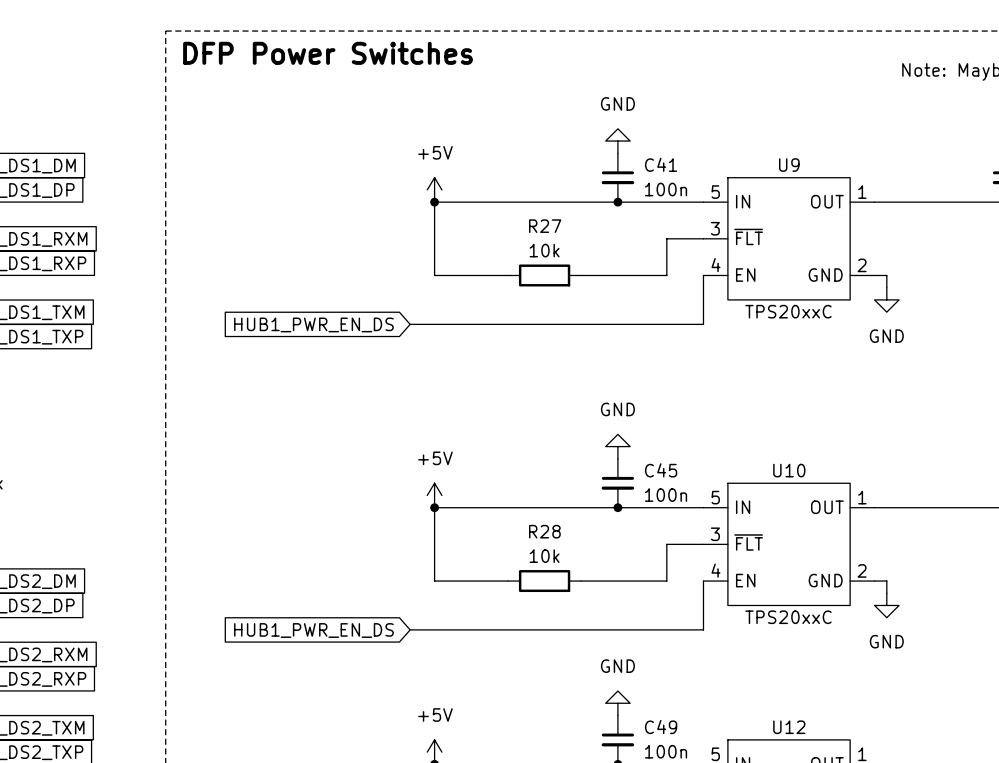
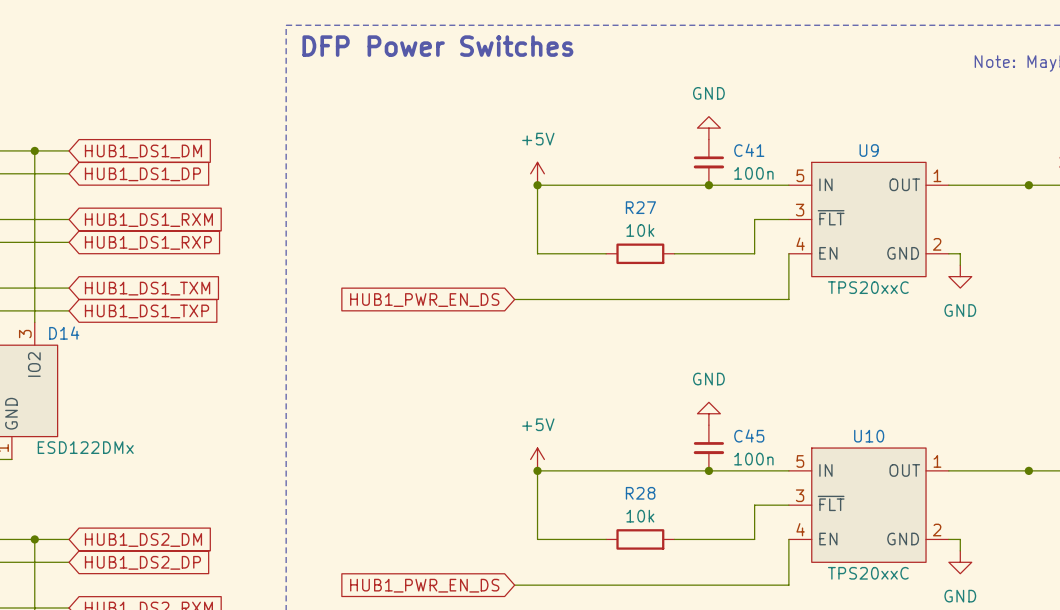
junction: none -> (1028, 185)
junction: none -> (1028, 470)

